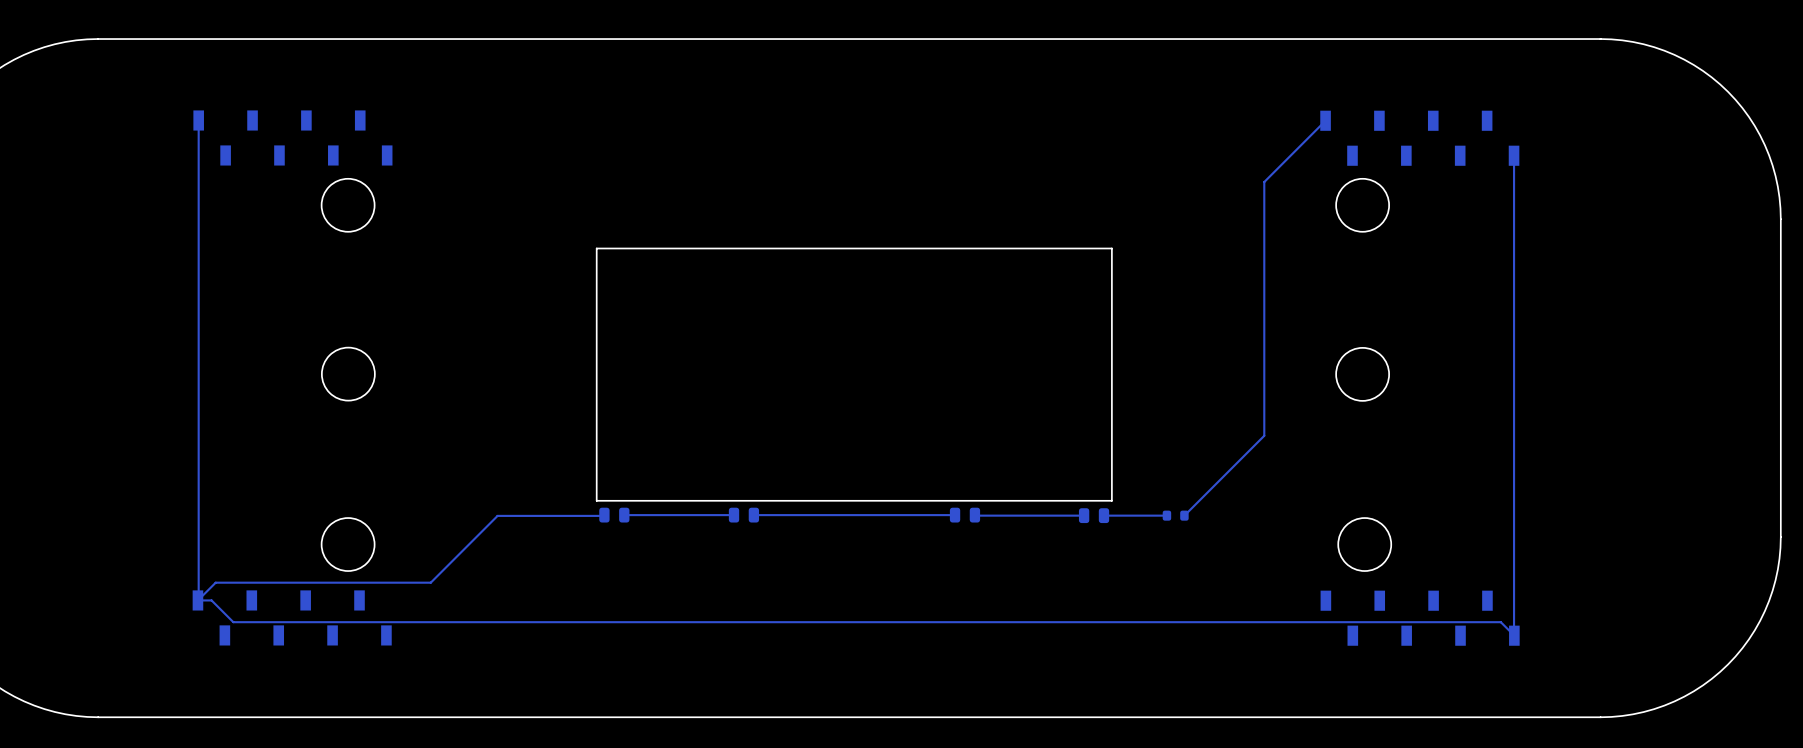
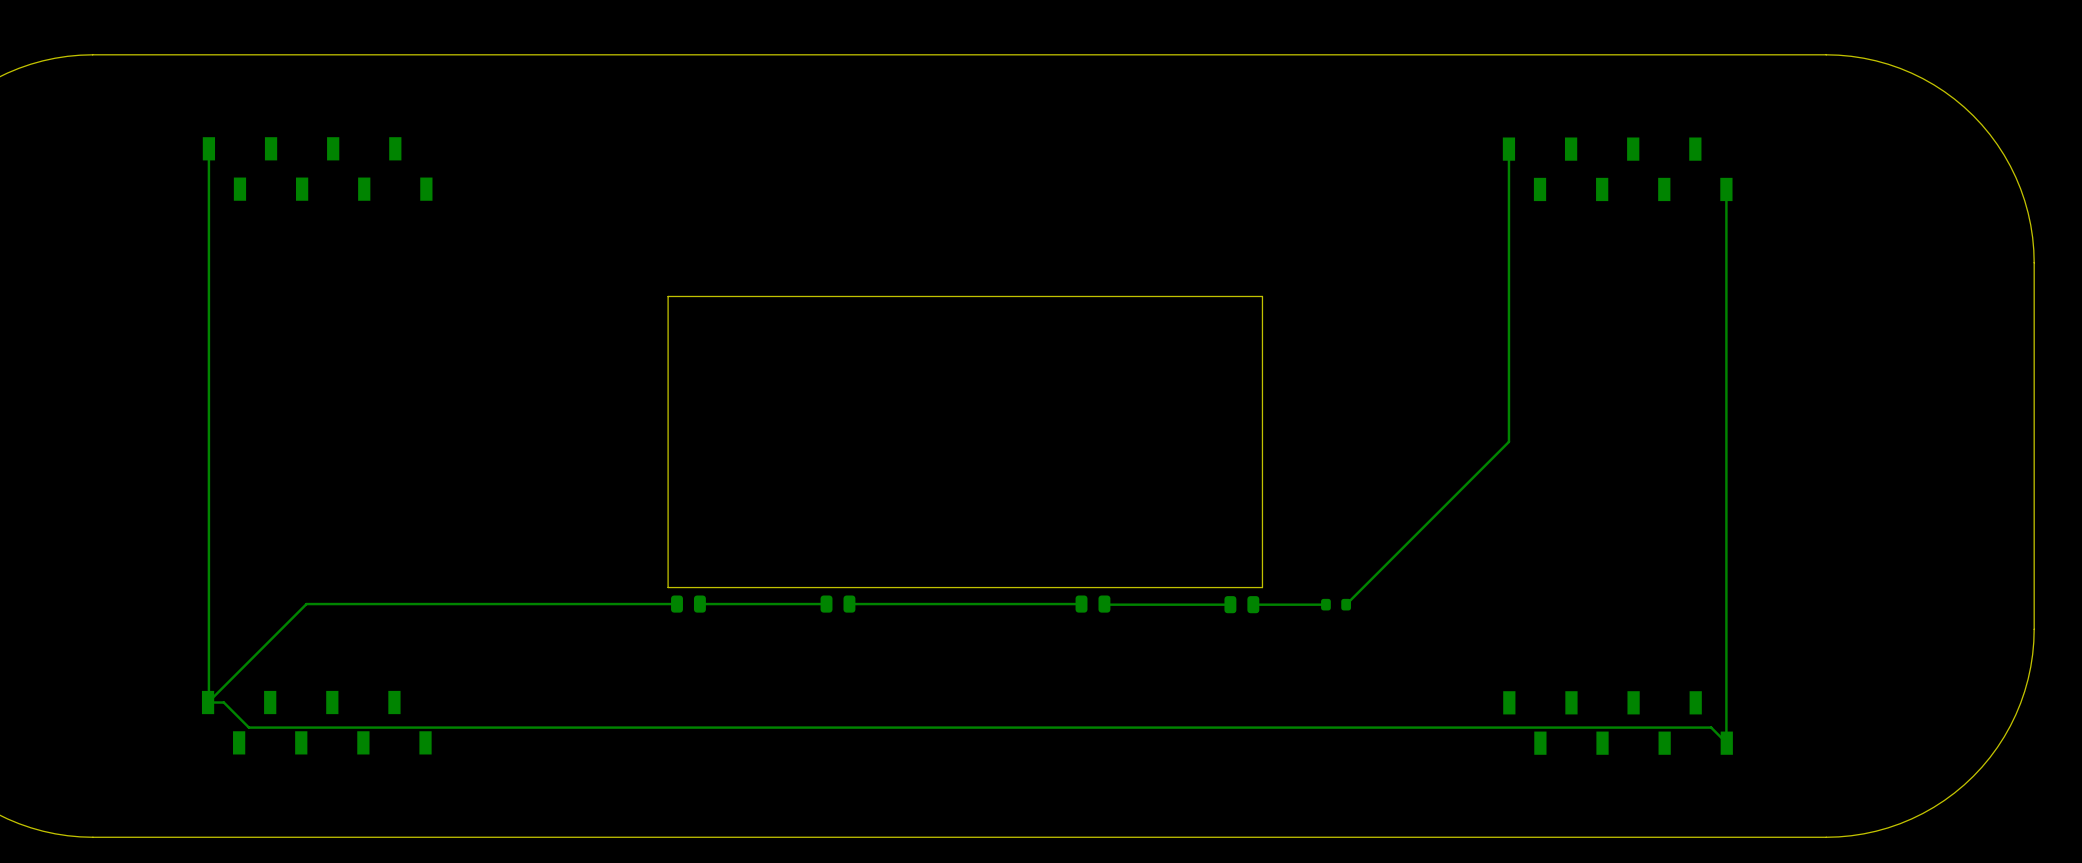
bottom track: (1325, 120) (1264, 182) (1264, 435) -> (1508, 149) (1508, 441) (1438, 512)
round board edge: [321, 178, 375, 233] -> none
round board edge: [1335, 178, 1390, 233] -> none
round board edge: [321, 347, 376, 401] -> none
round board edge: [1335, 347, 1390, 402] -> none
bottom track: (604, 515) (497, 515) (430, 582) (215, 582) -> (677, 604) (306, 604) (228, 682)
round board edge: [321, 517, 375, 572] -> none
round board edge: [1337, 517, 1392, 572] -> none

